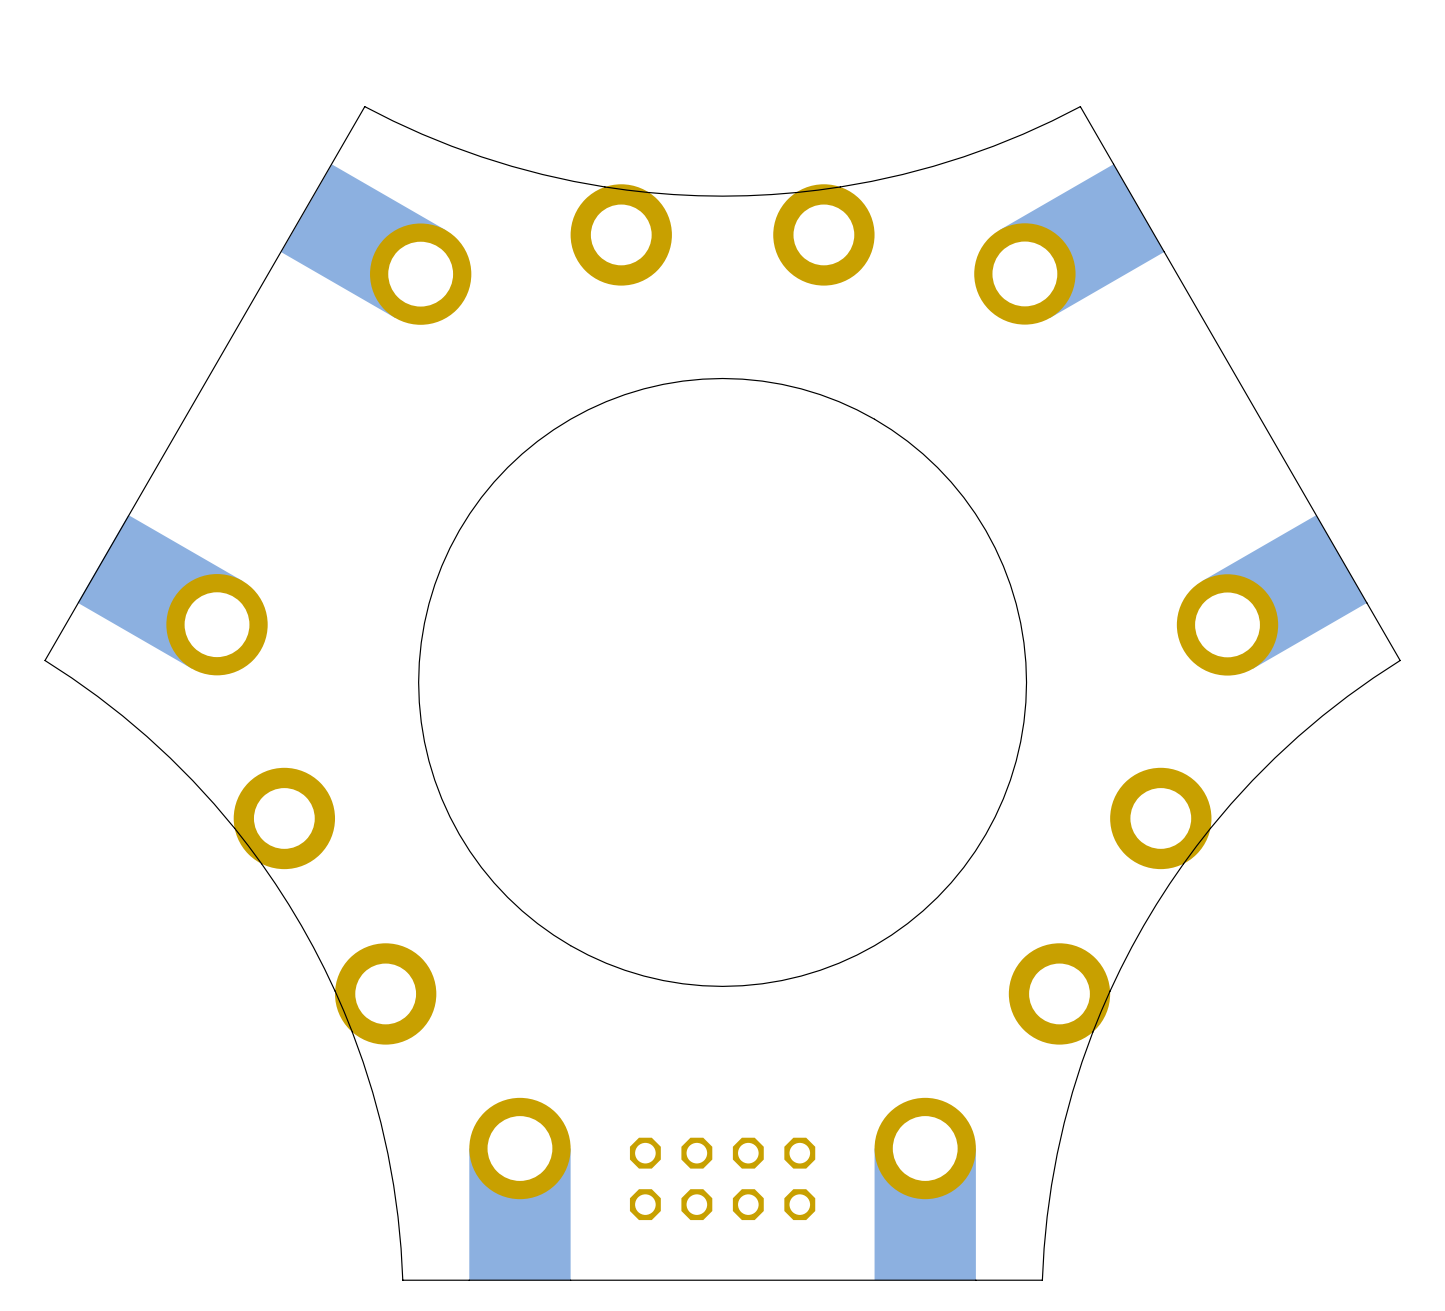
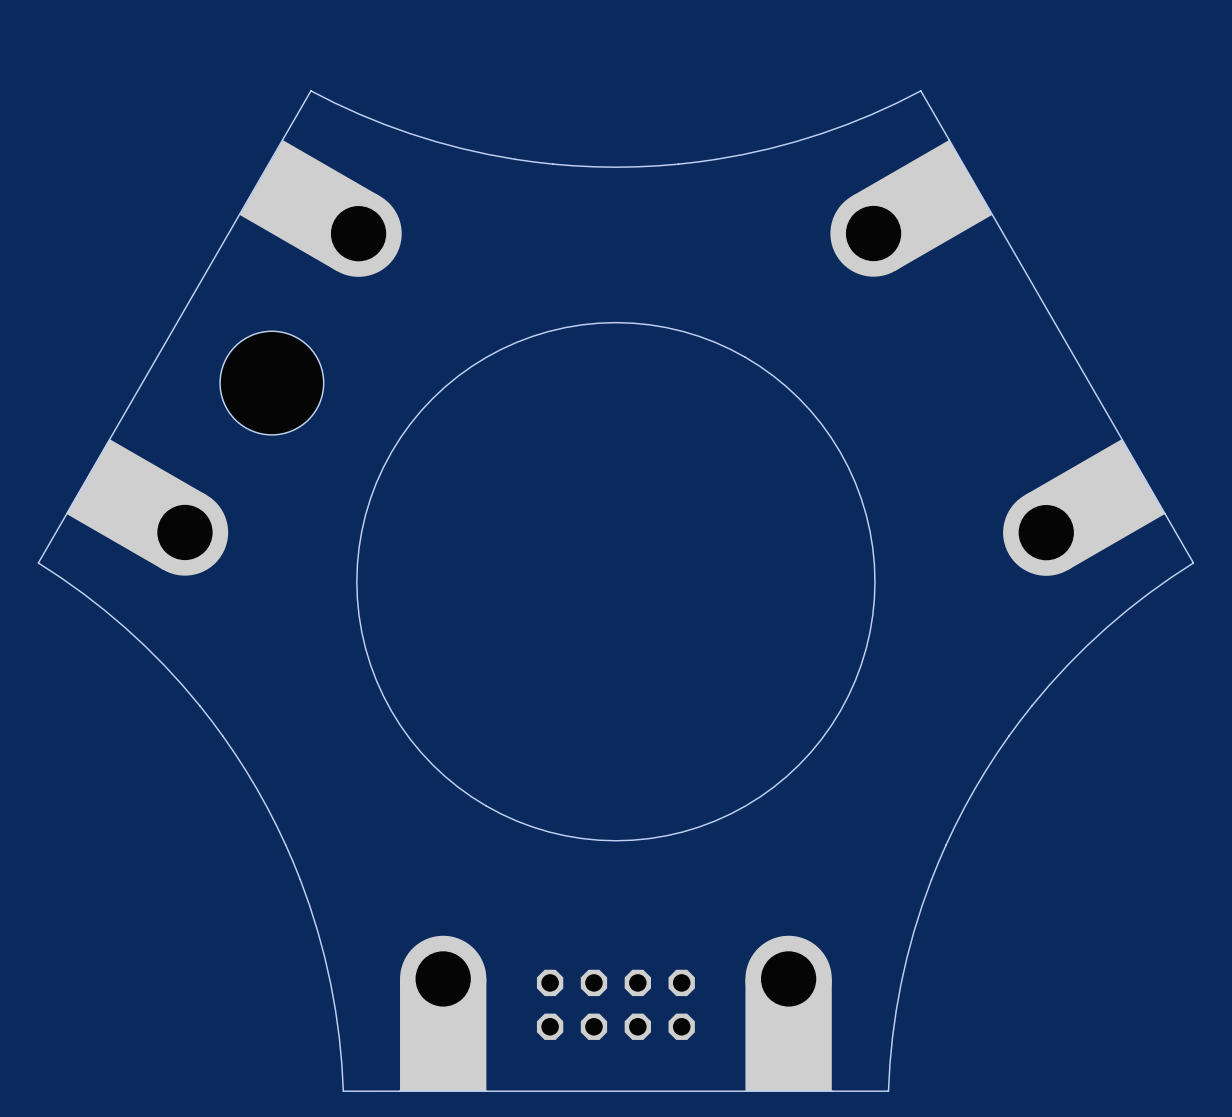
part: (621, 234) -> none
part: (823, 234) -> none
hole: none -> (271, 383)
part: (284, 818) -> none
part: (1160, 818) -> none
part: (385, 993) -> none
part: (1059, 993) -> none

